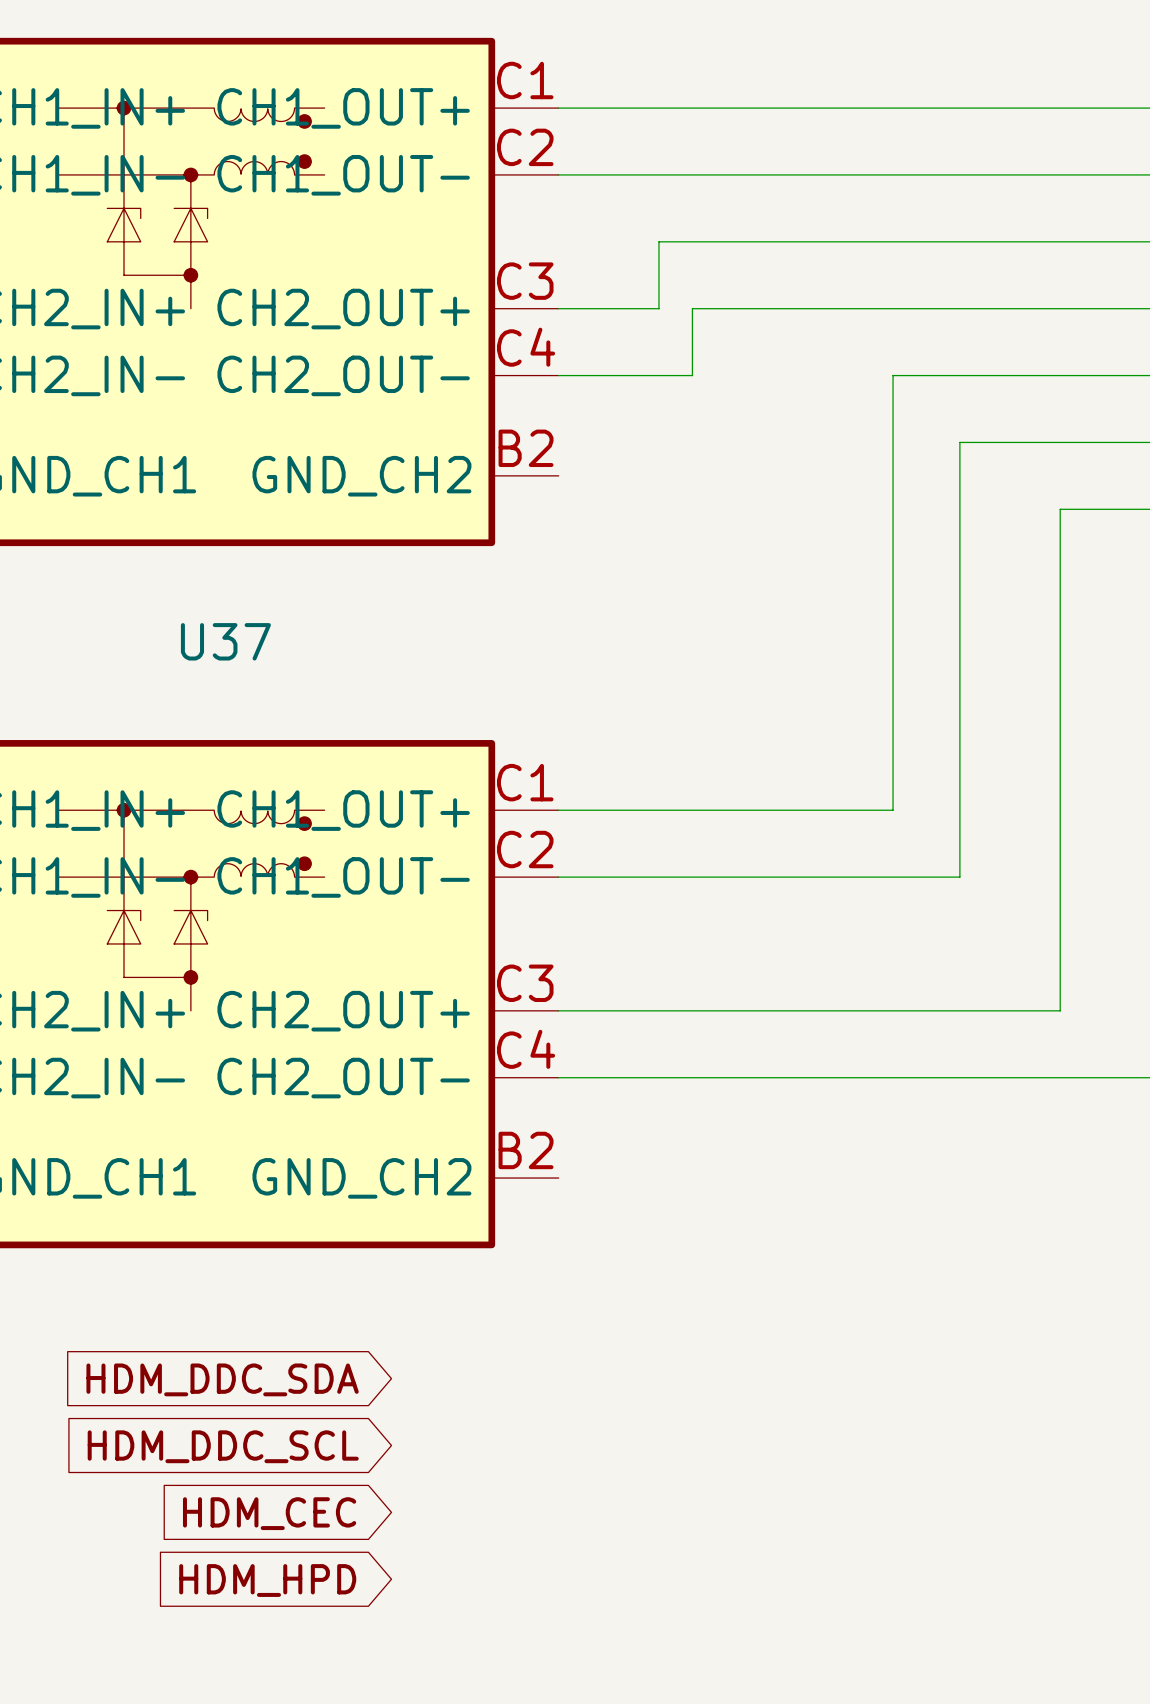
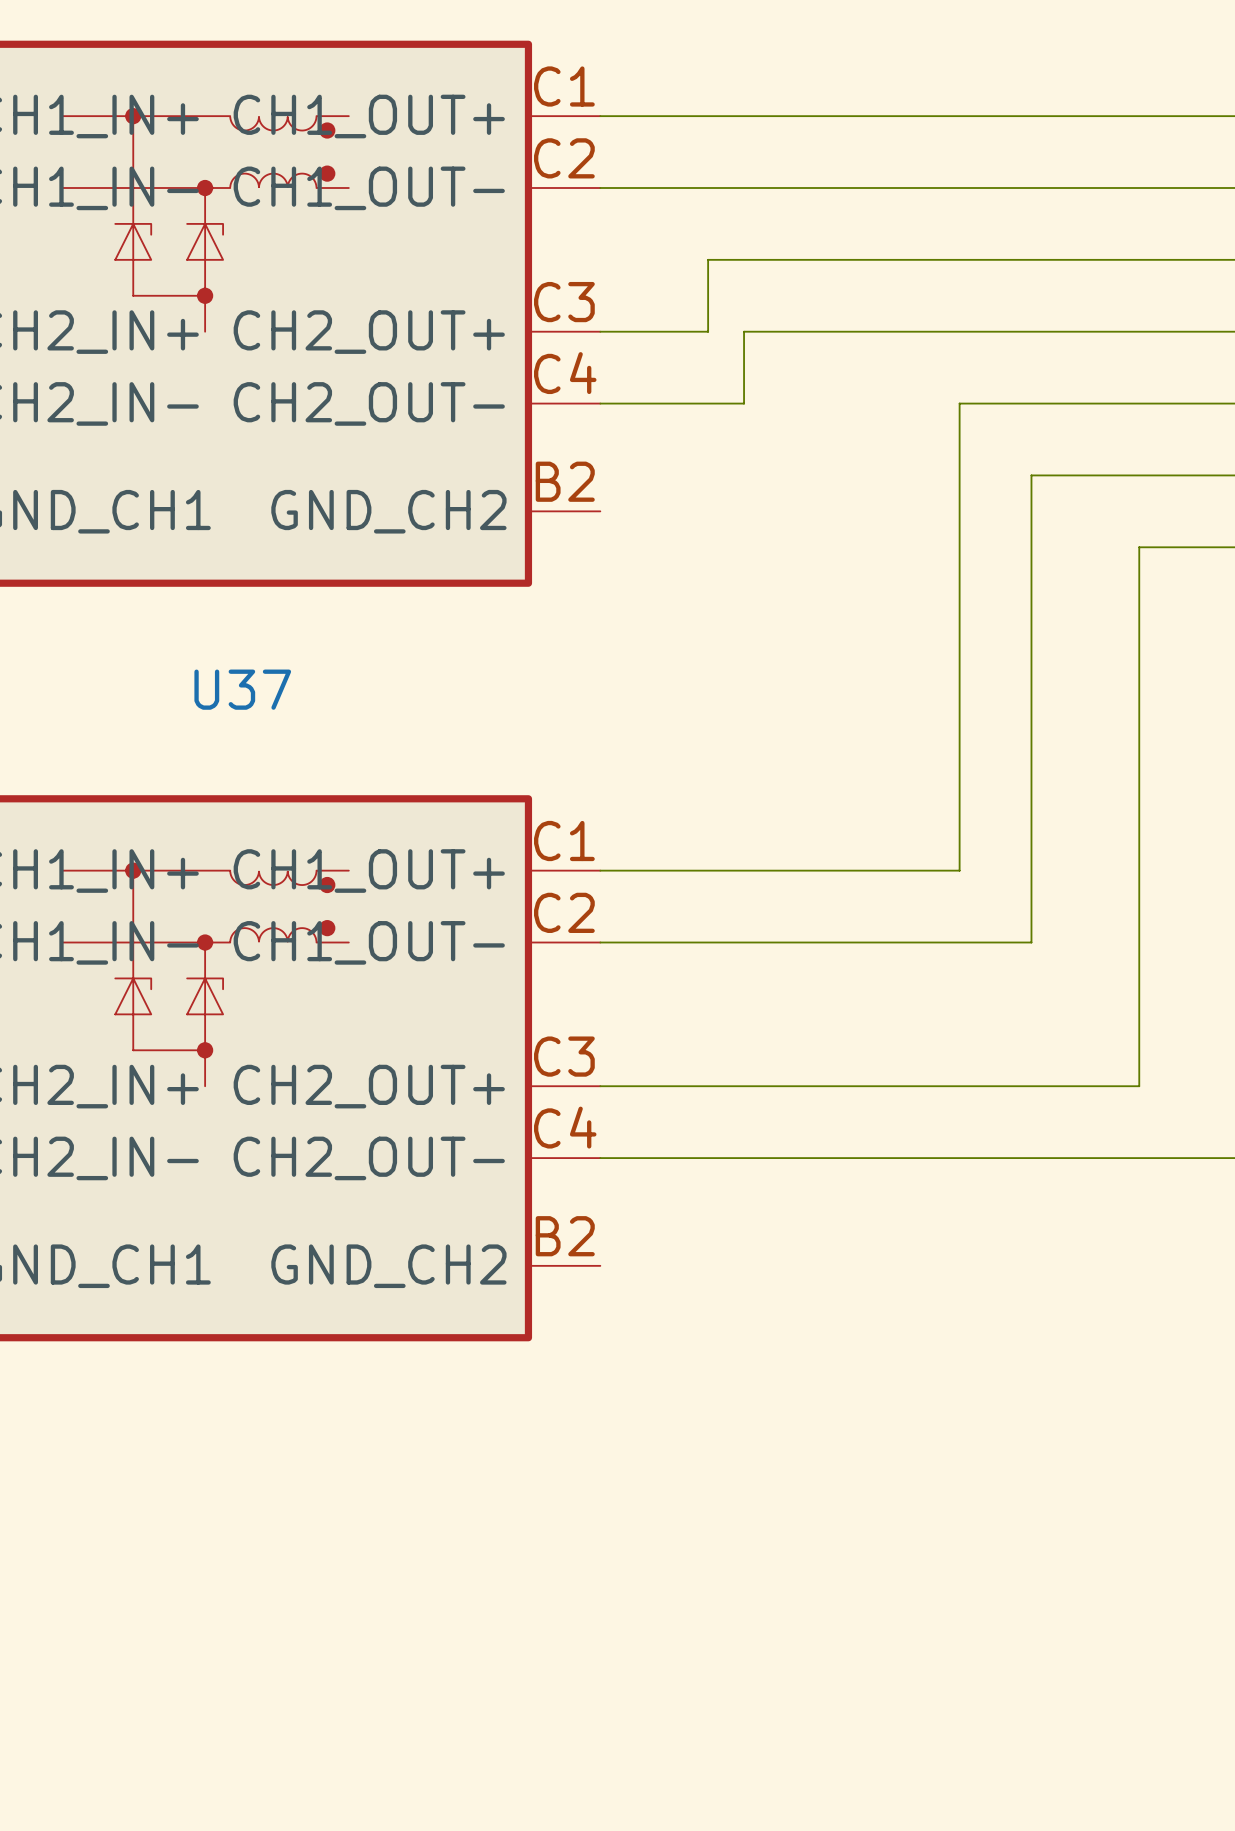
global label: HDM_DDC_SDA (222, 1379) -> none
global label: HDM_DDC_SCL (223, 1446) -> none
global label: HDM_CEC (269, 1513) -> none
global label: HDM_HPD (267, 1580) -> none

